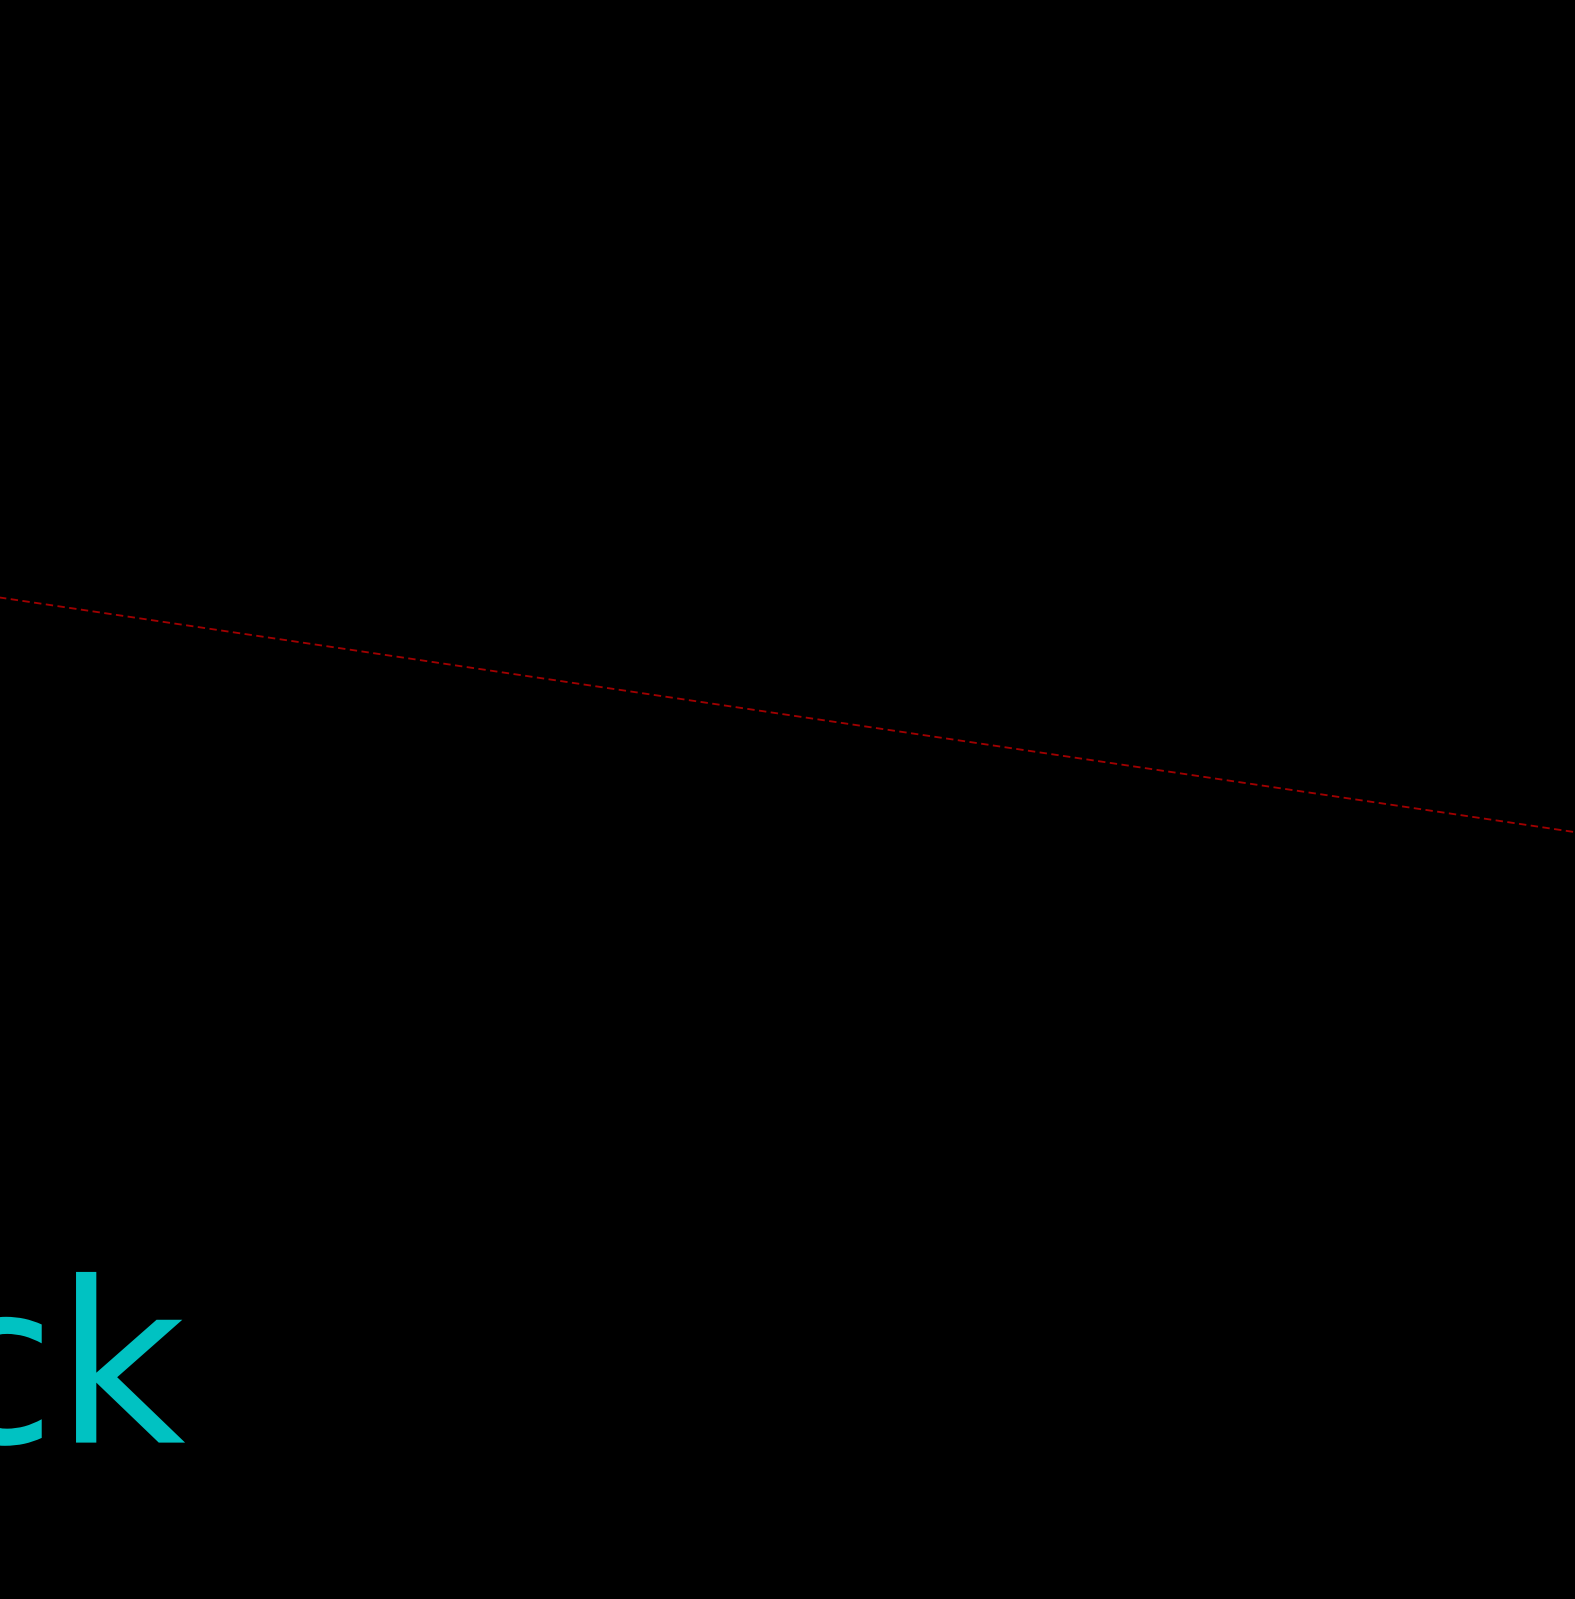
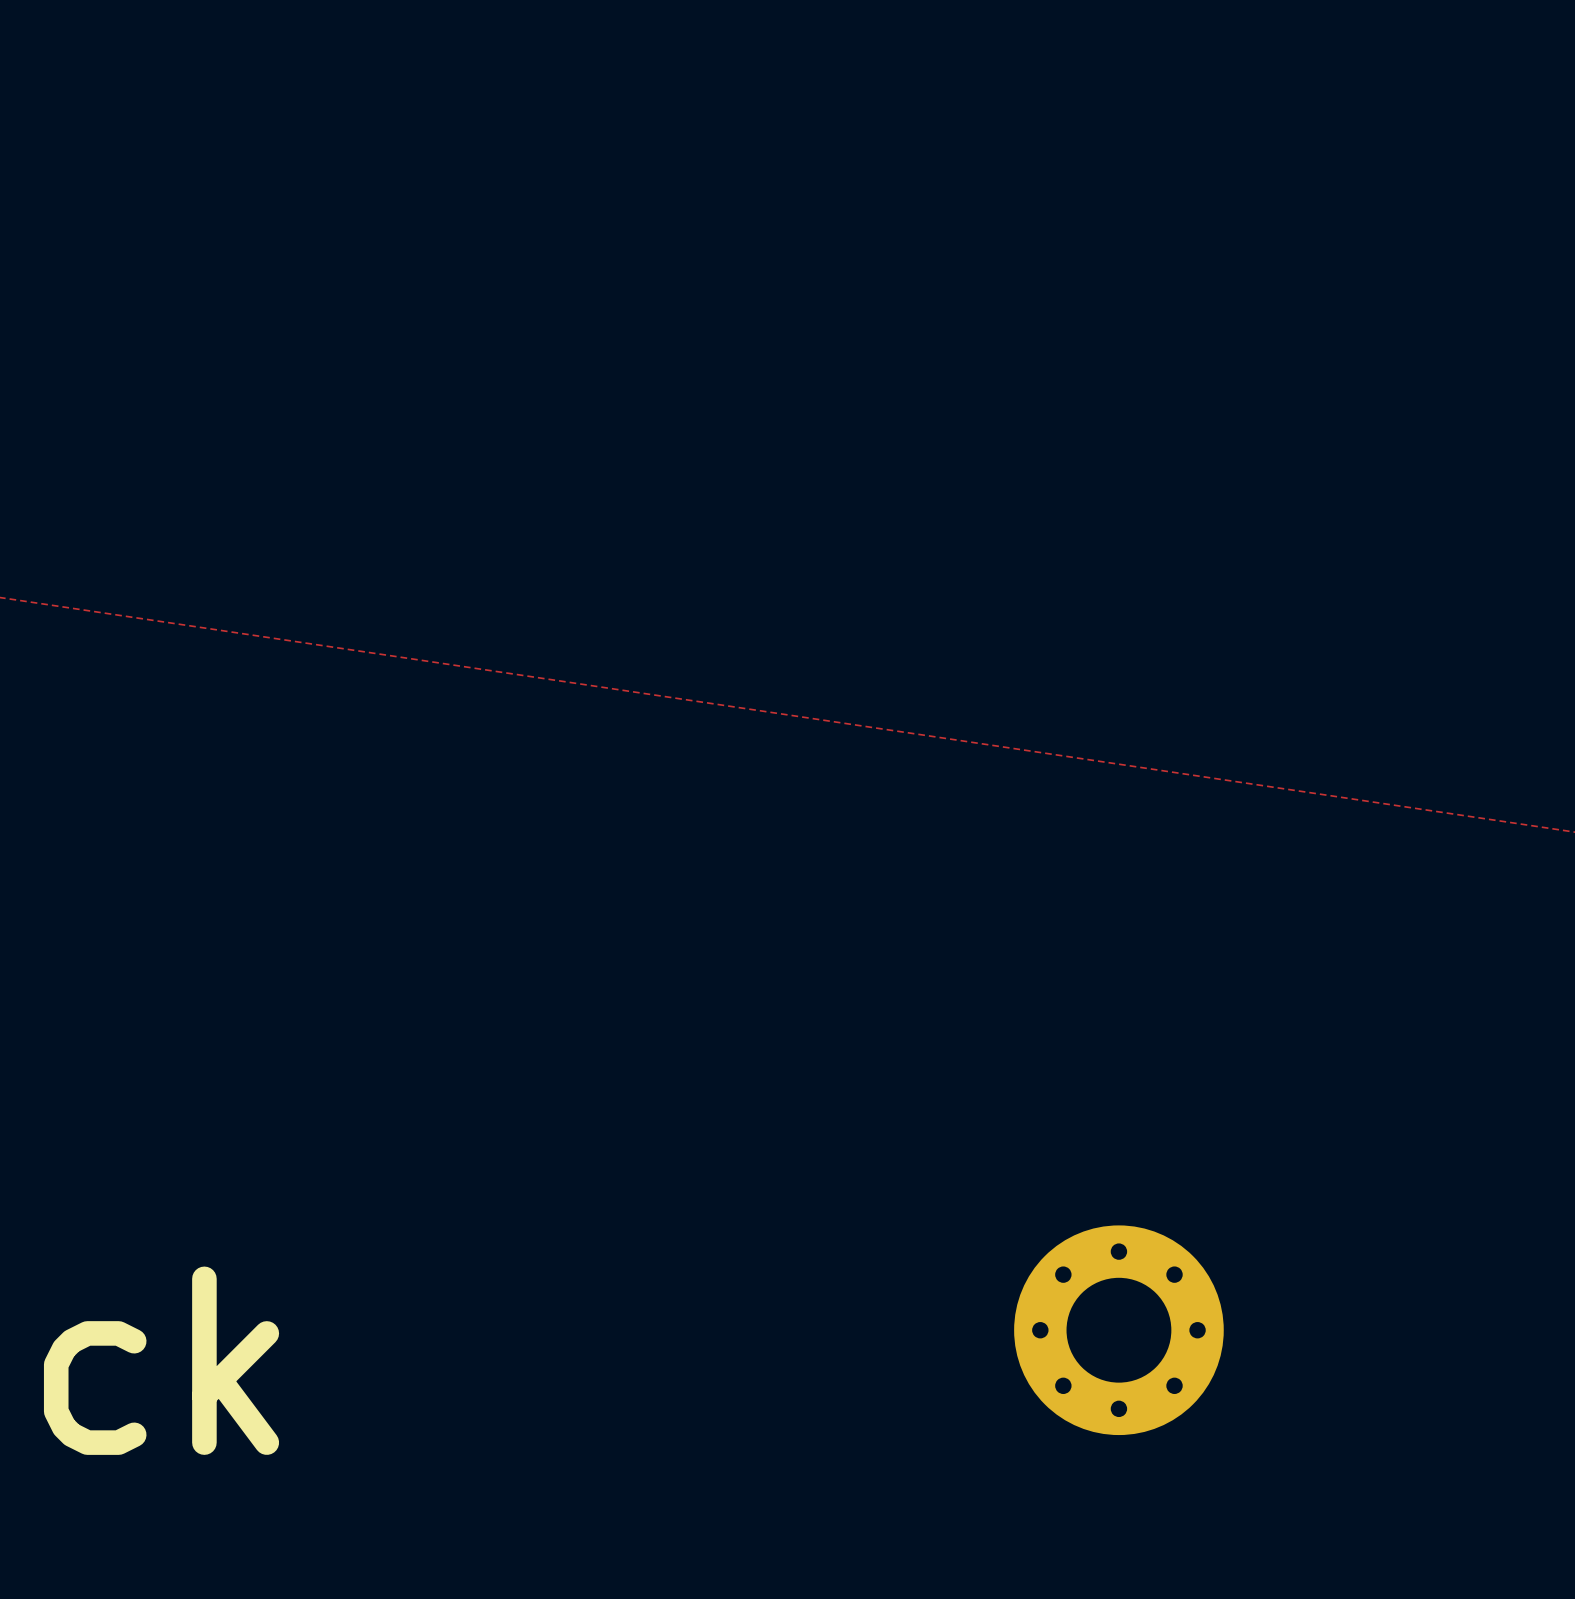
part: none -> (1118, 1330)

